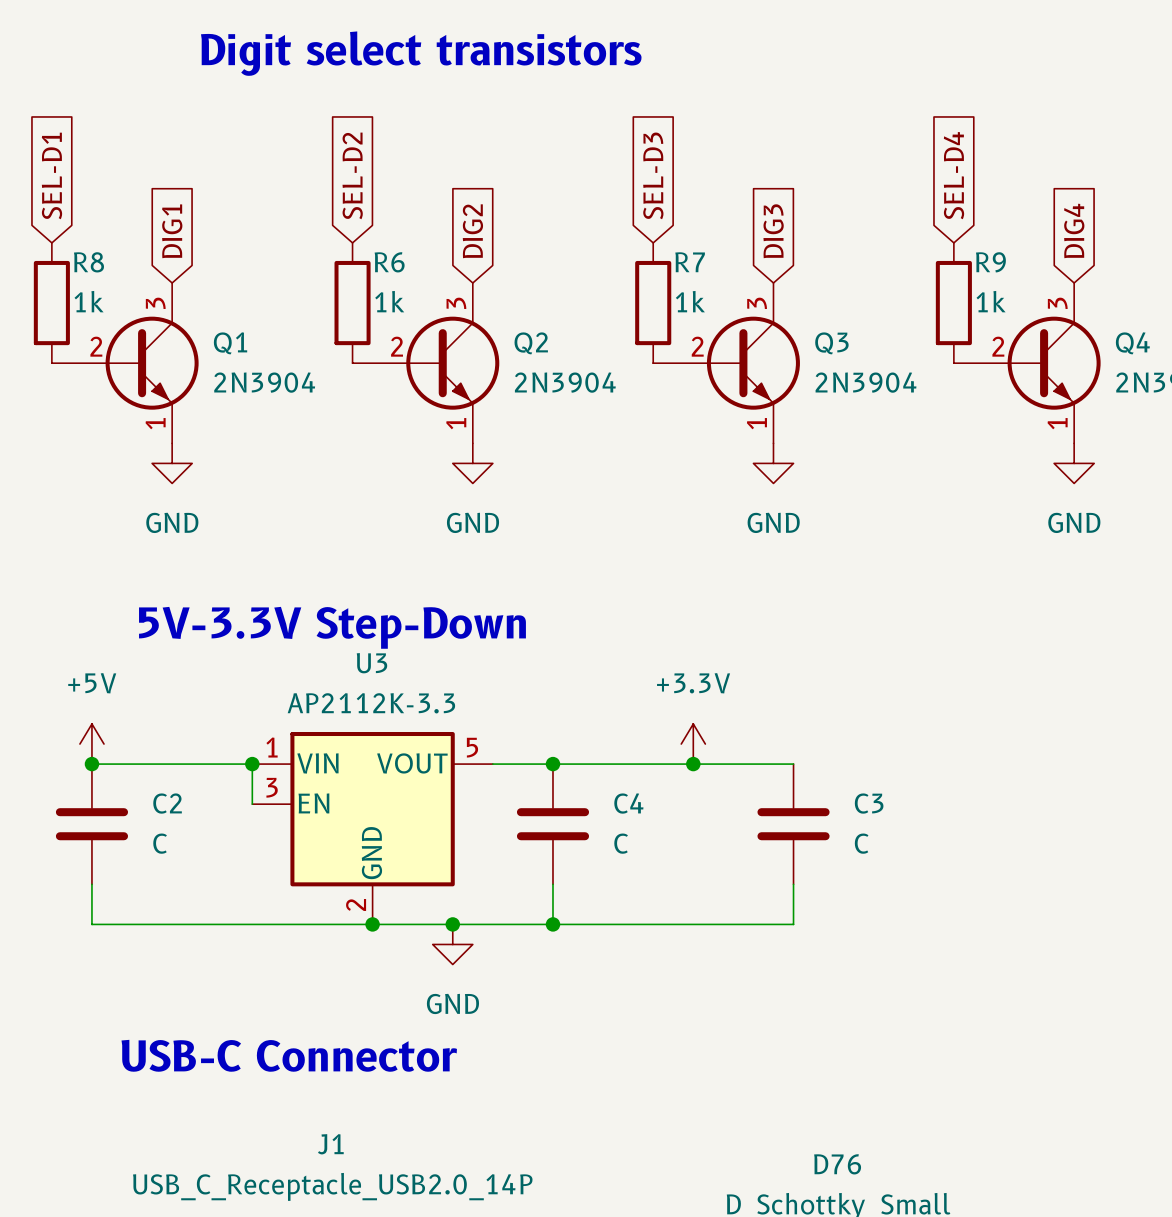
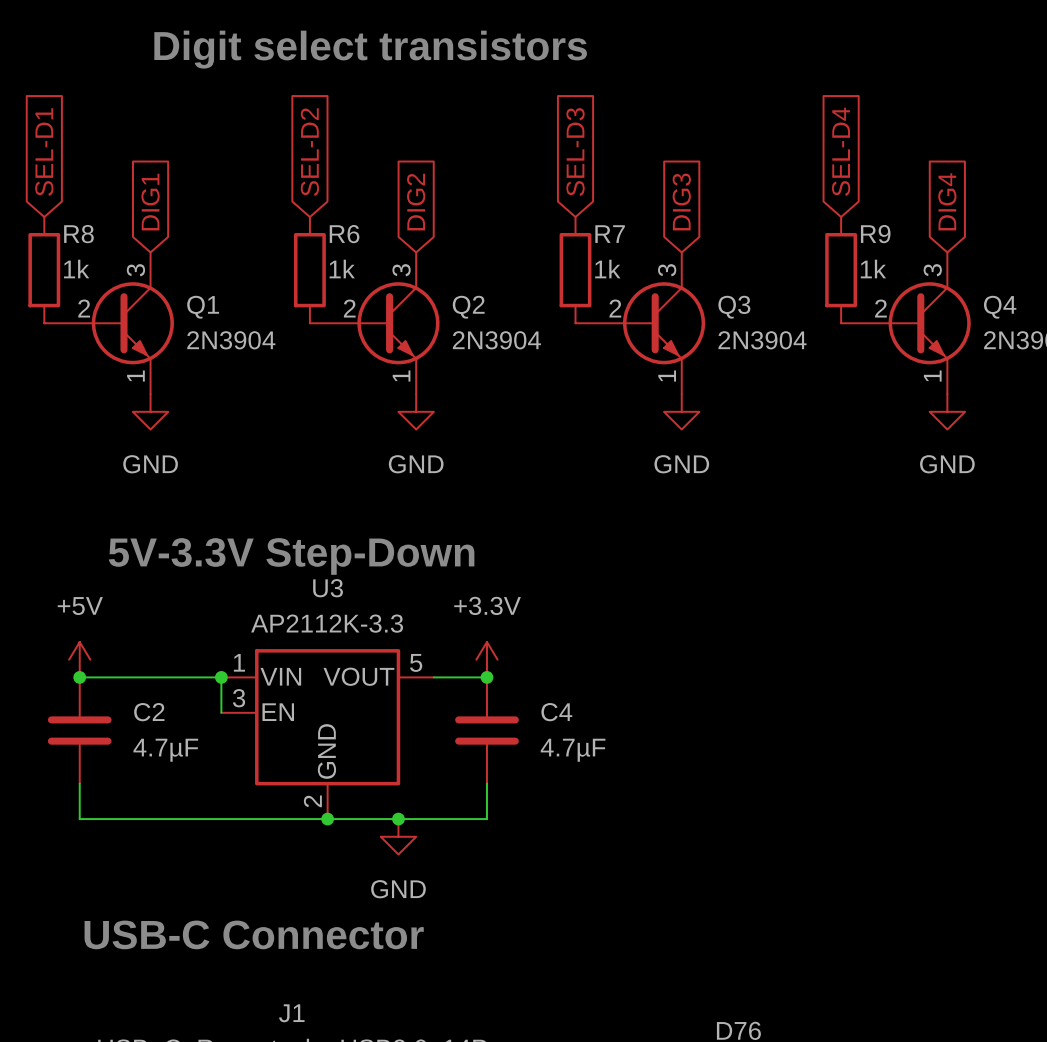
power symbol position: +3.3V (693, 744) -> +3.3V (486, 659)
wire: (552, 764) (793, 764) -> none
junction: (693, 764) -> none
C3: C (793, 824) -> none
C2 value: C (160, 843) -> 4.7µF (165, 750)
C4 value: C (621, 843) -> 4.7µF (573, 750)
wire: (793, 884) (793, 924) (552, 924) -> none
junction: (552, 924) -> none

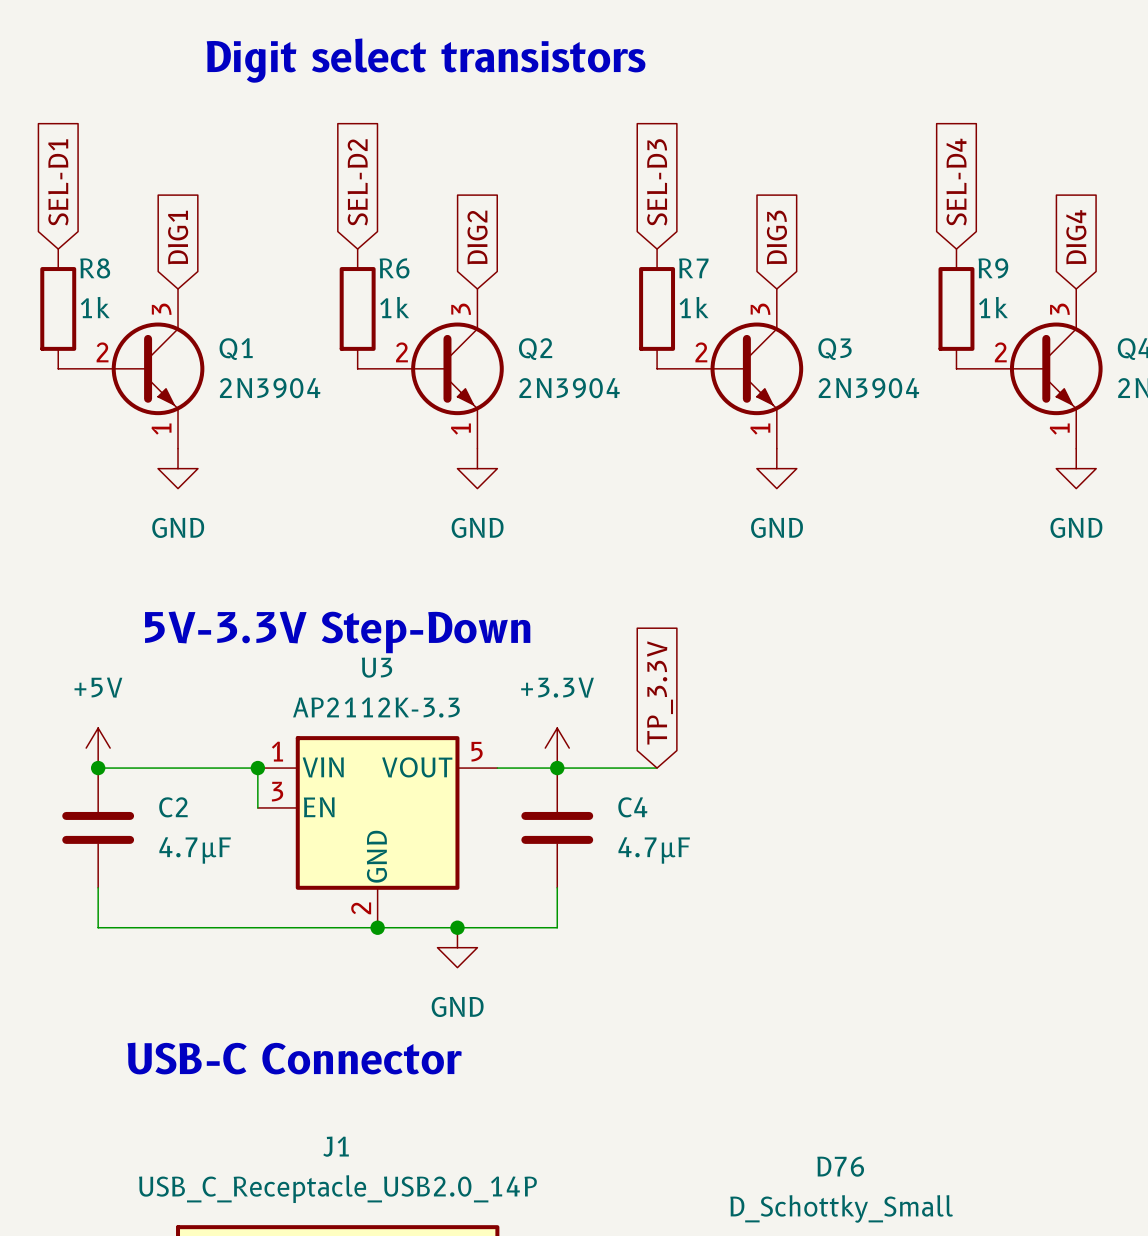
global label: none -> TP_3.3V (660, 692)
wire: none -> (557, 768) (657, 768)

